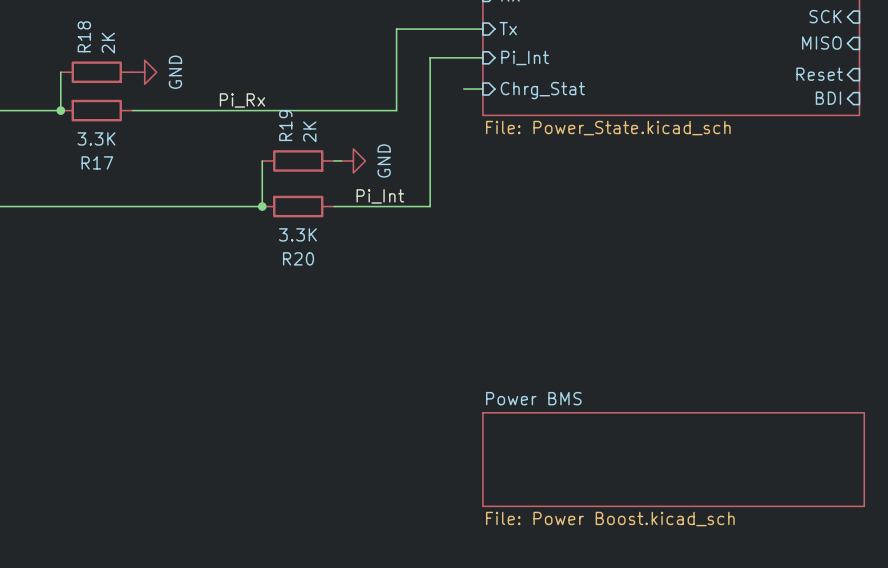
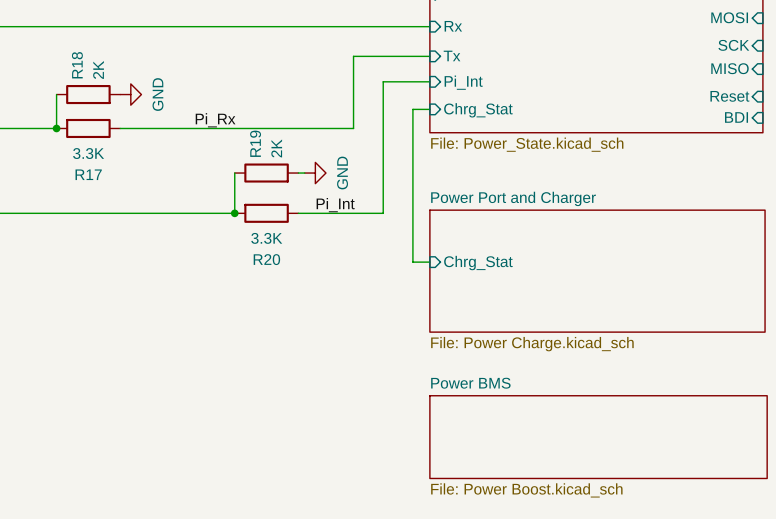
wire: none -> (412, 109) (412, 262) (429, 262)
sheet pin: none -> Chrg_Stat (478, 263)
sheet Power Port and Charger: none -> File: Power Charge.kicad_sch (597, 271)

